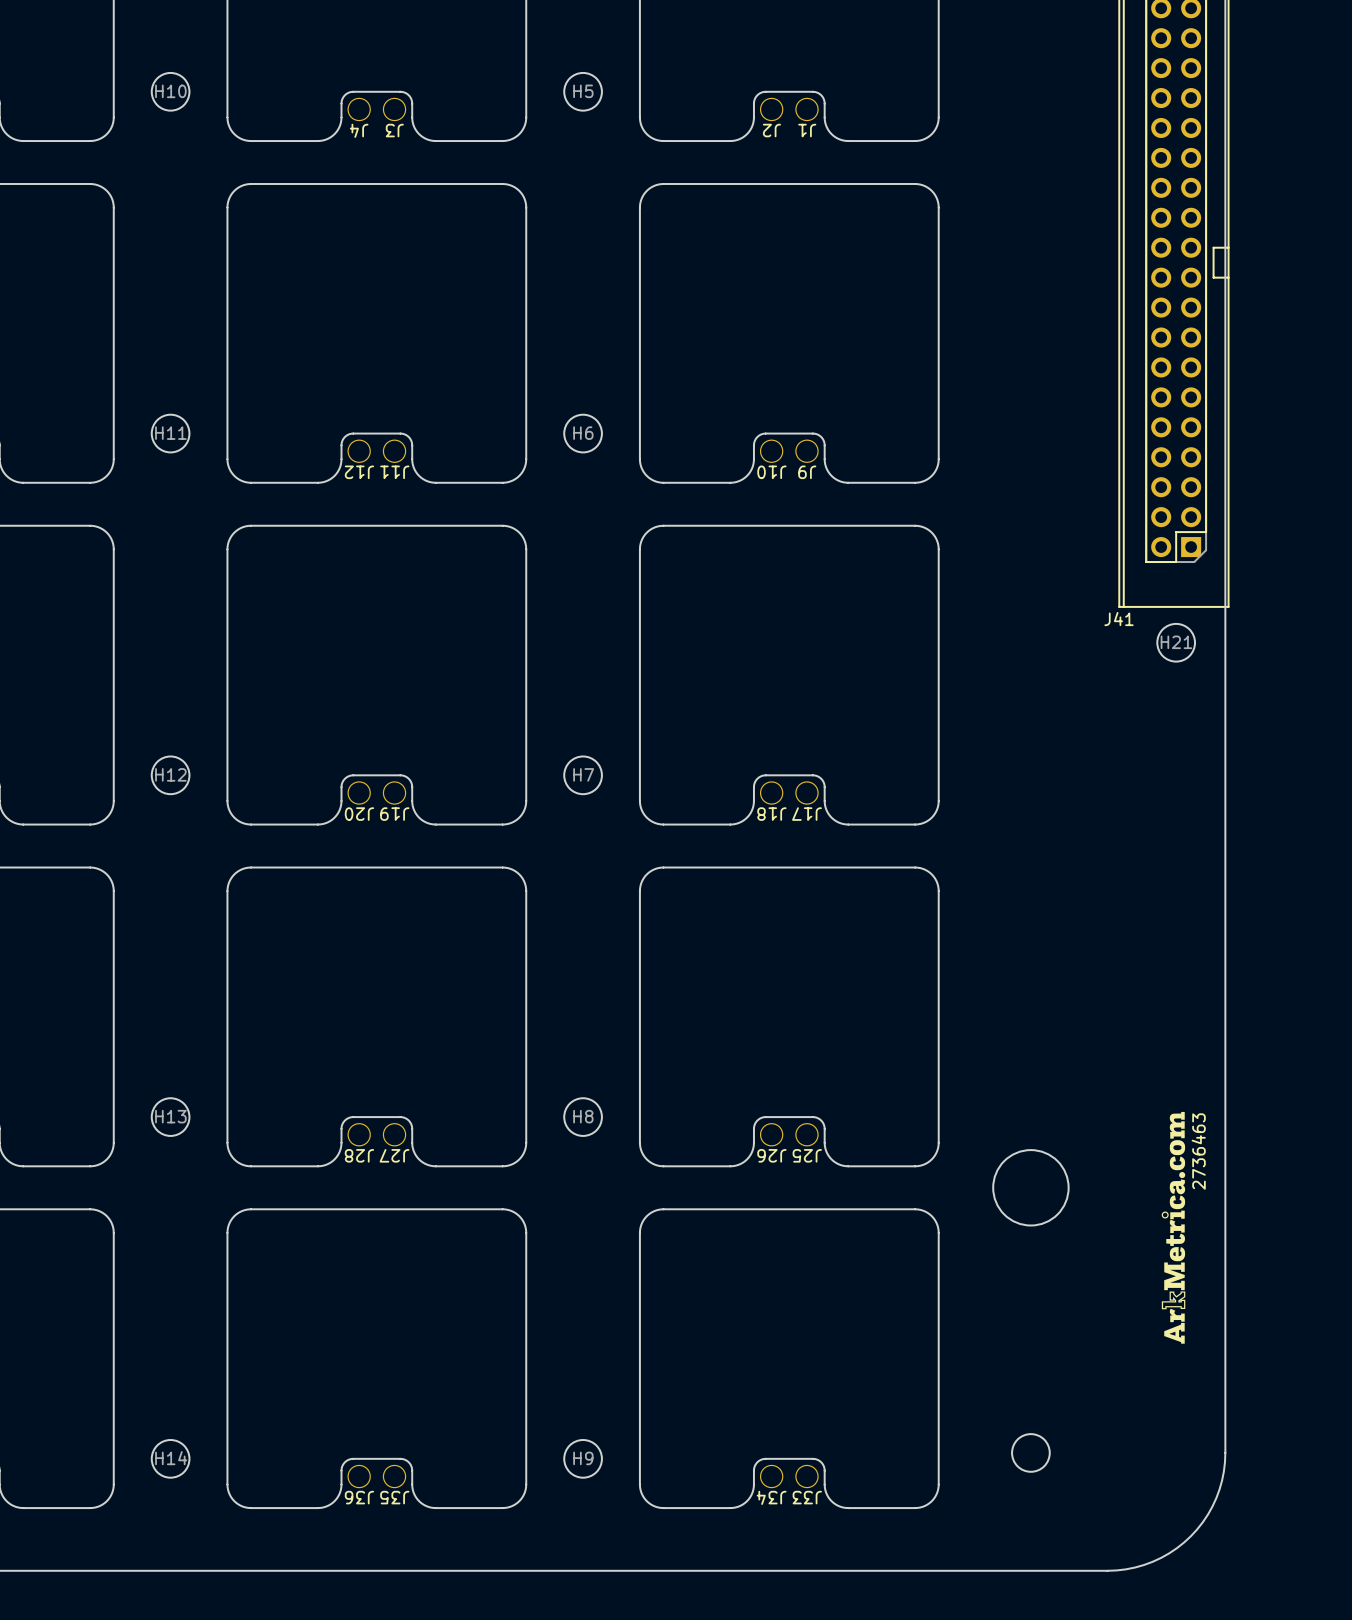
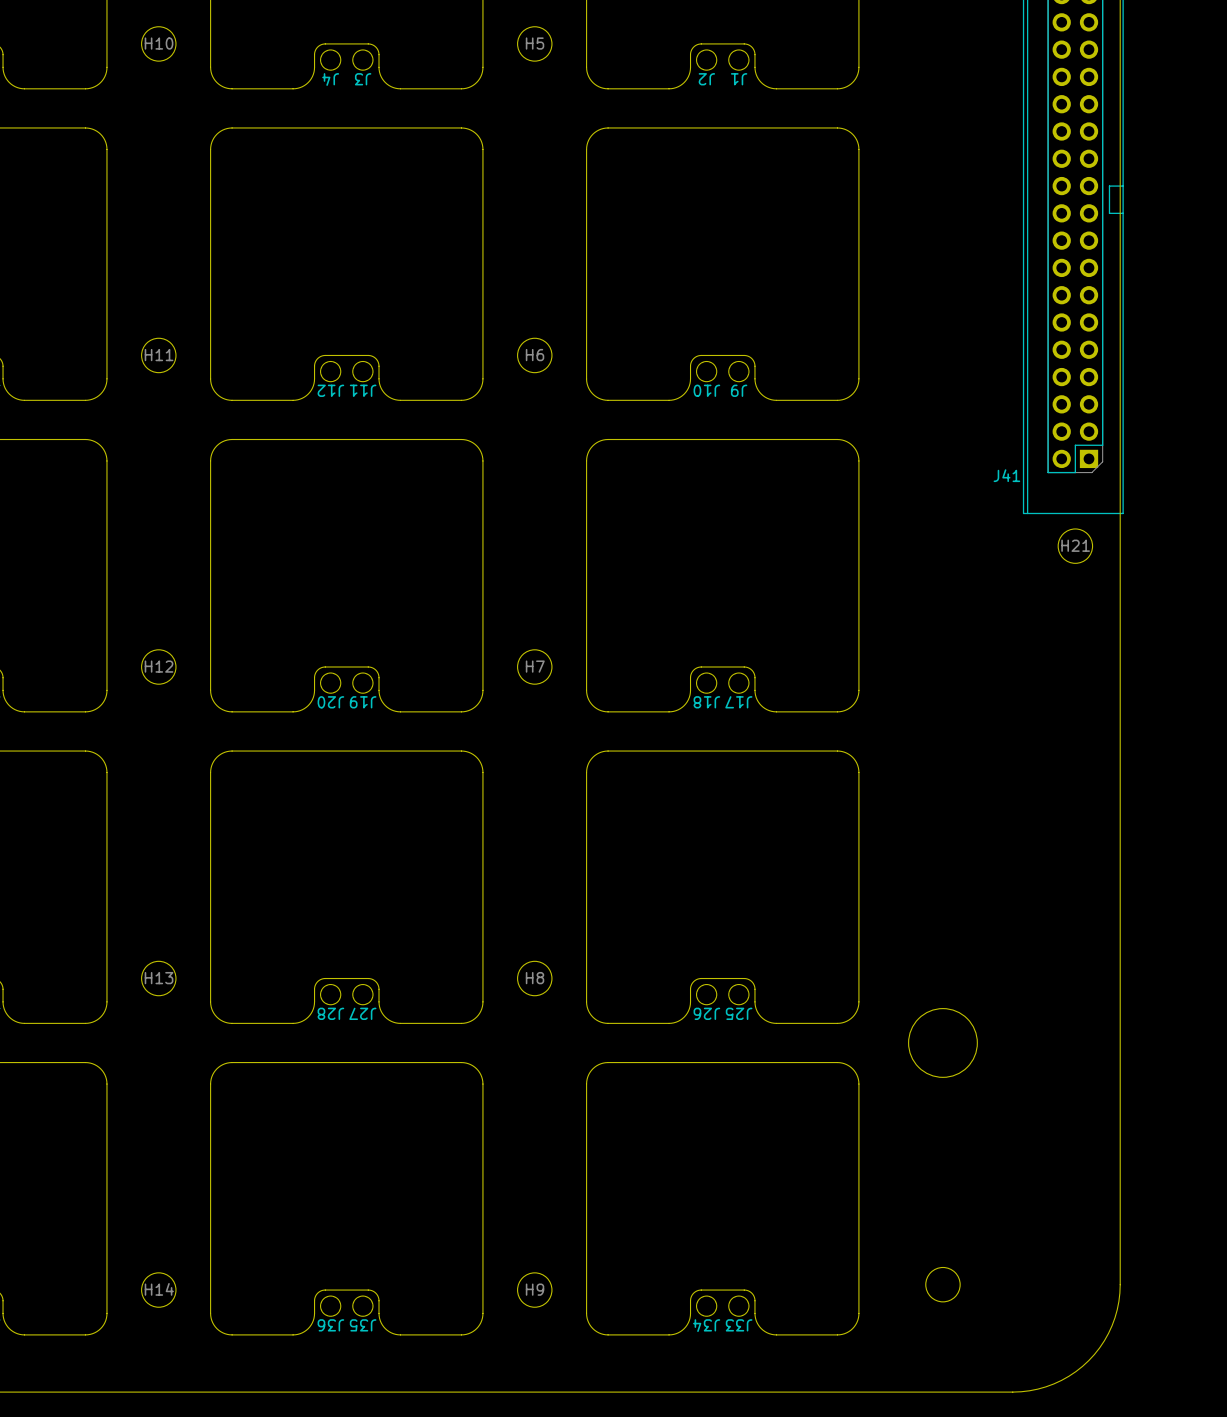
J41 name position: J41 (1119, 619) -> J41 (1006, 475)
drawing: [1161, 1111, 1186, 1344] -> none
text: 2736463 (1198, 1151) -> none

